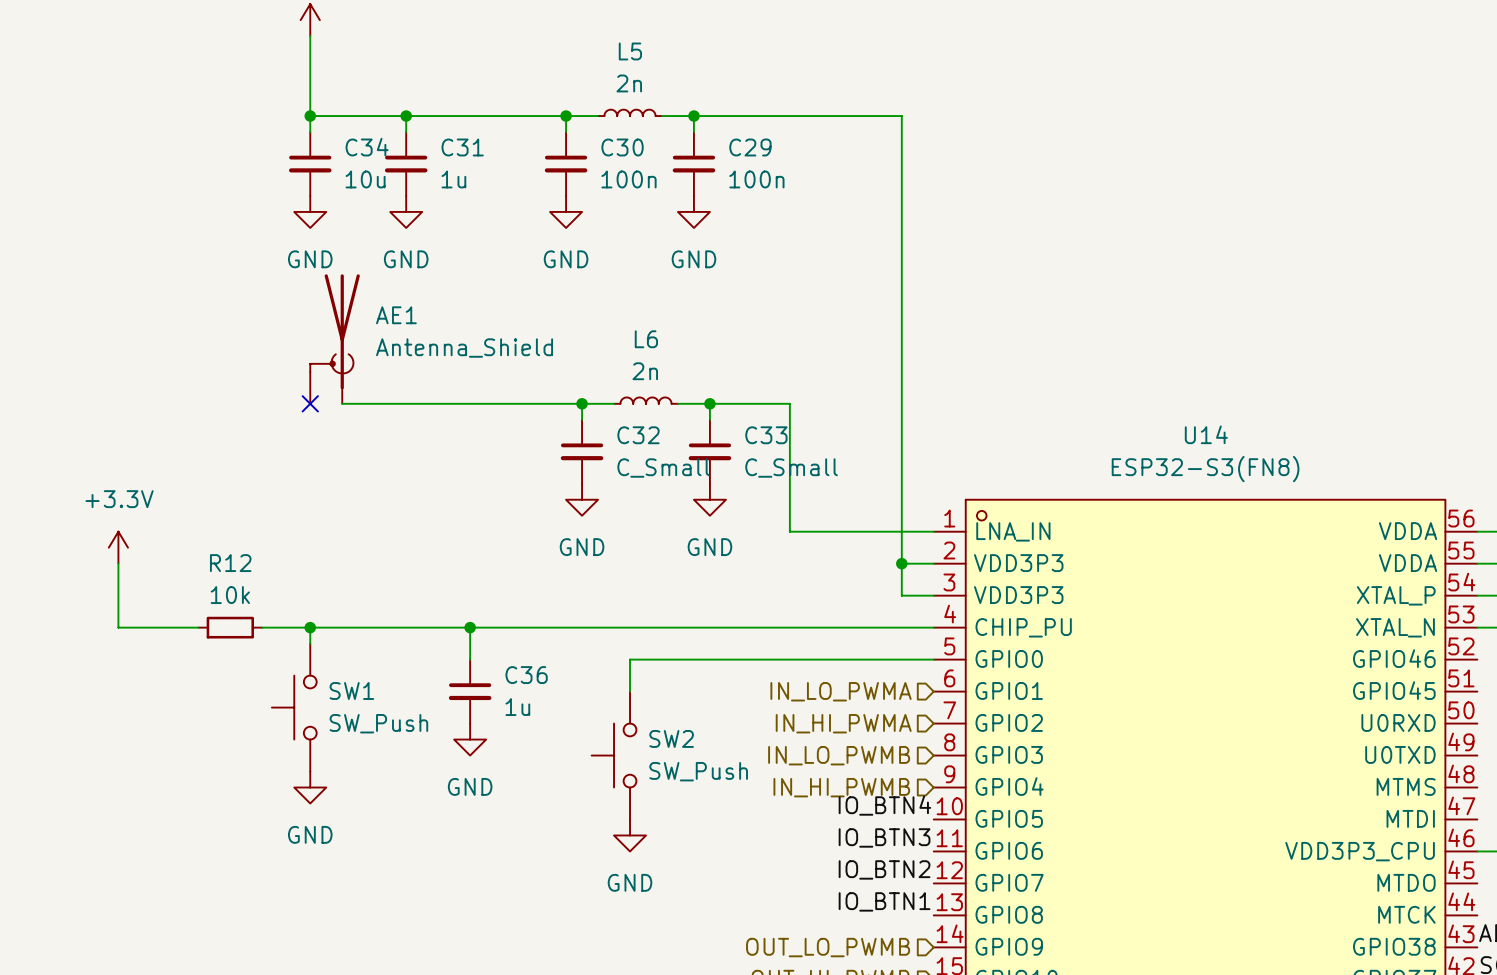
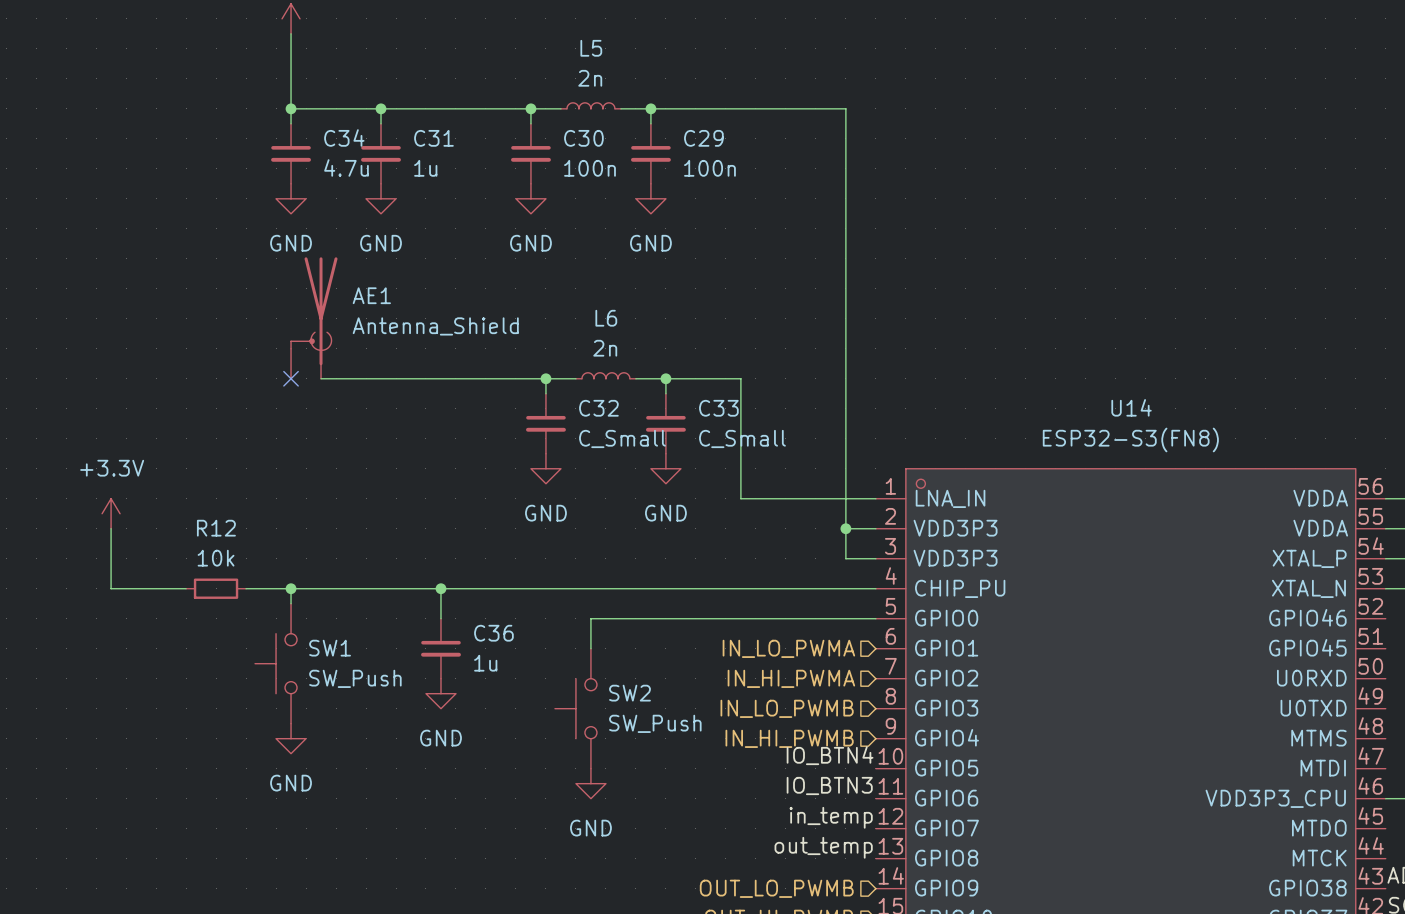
C34 value: 10u (365, 179) -> 4.7u (346, 167)
label: IO_BTN2 (884, 869) -> in_temp (831, 817)
label: IO_BTN1 (884, 901) -> out_temp (823, 847)

